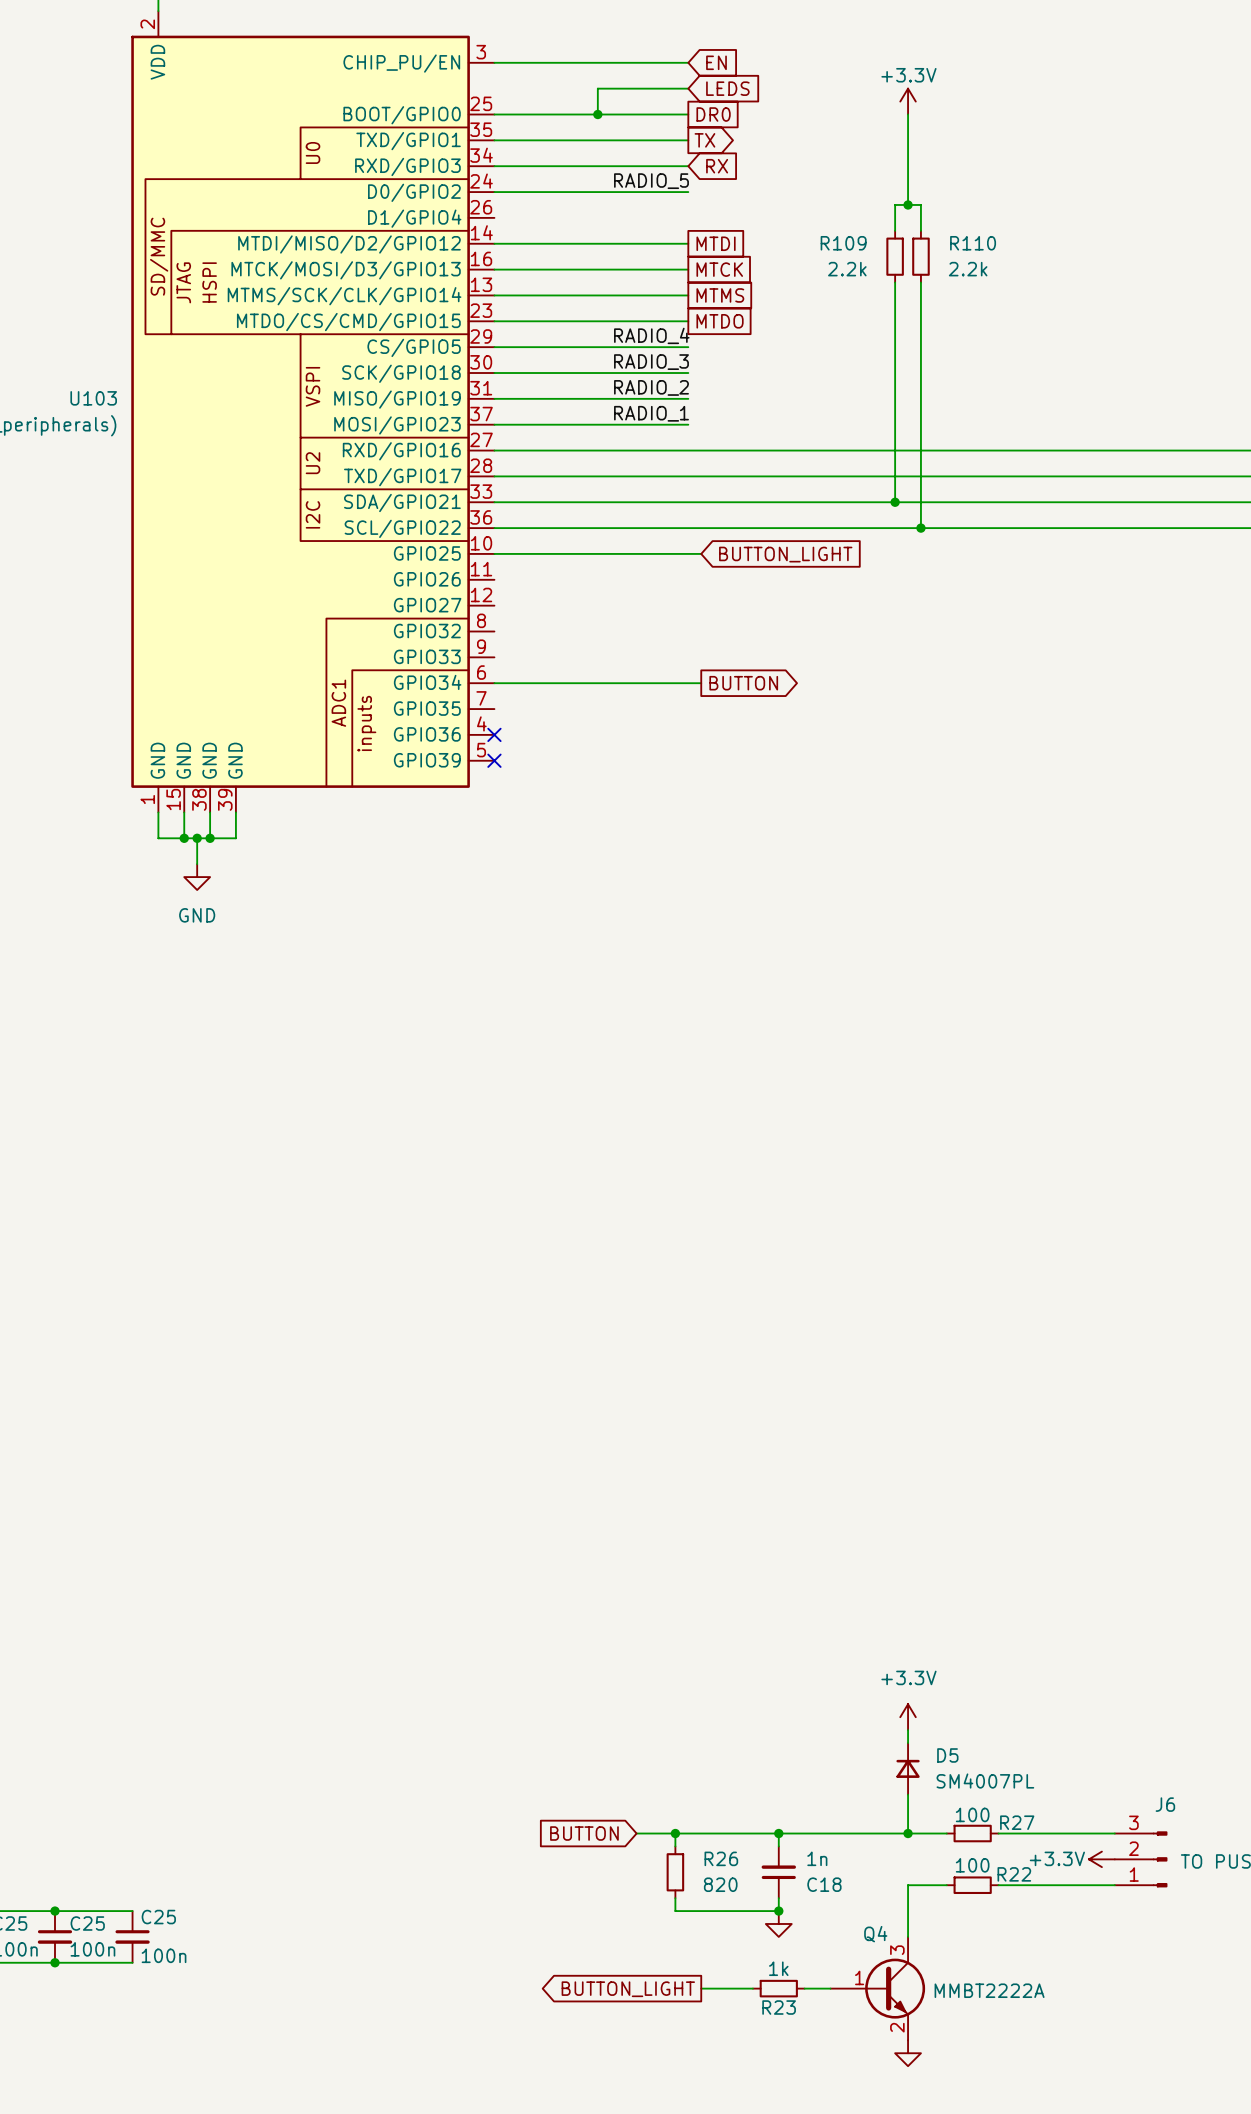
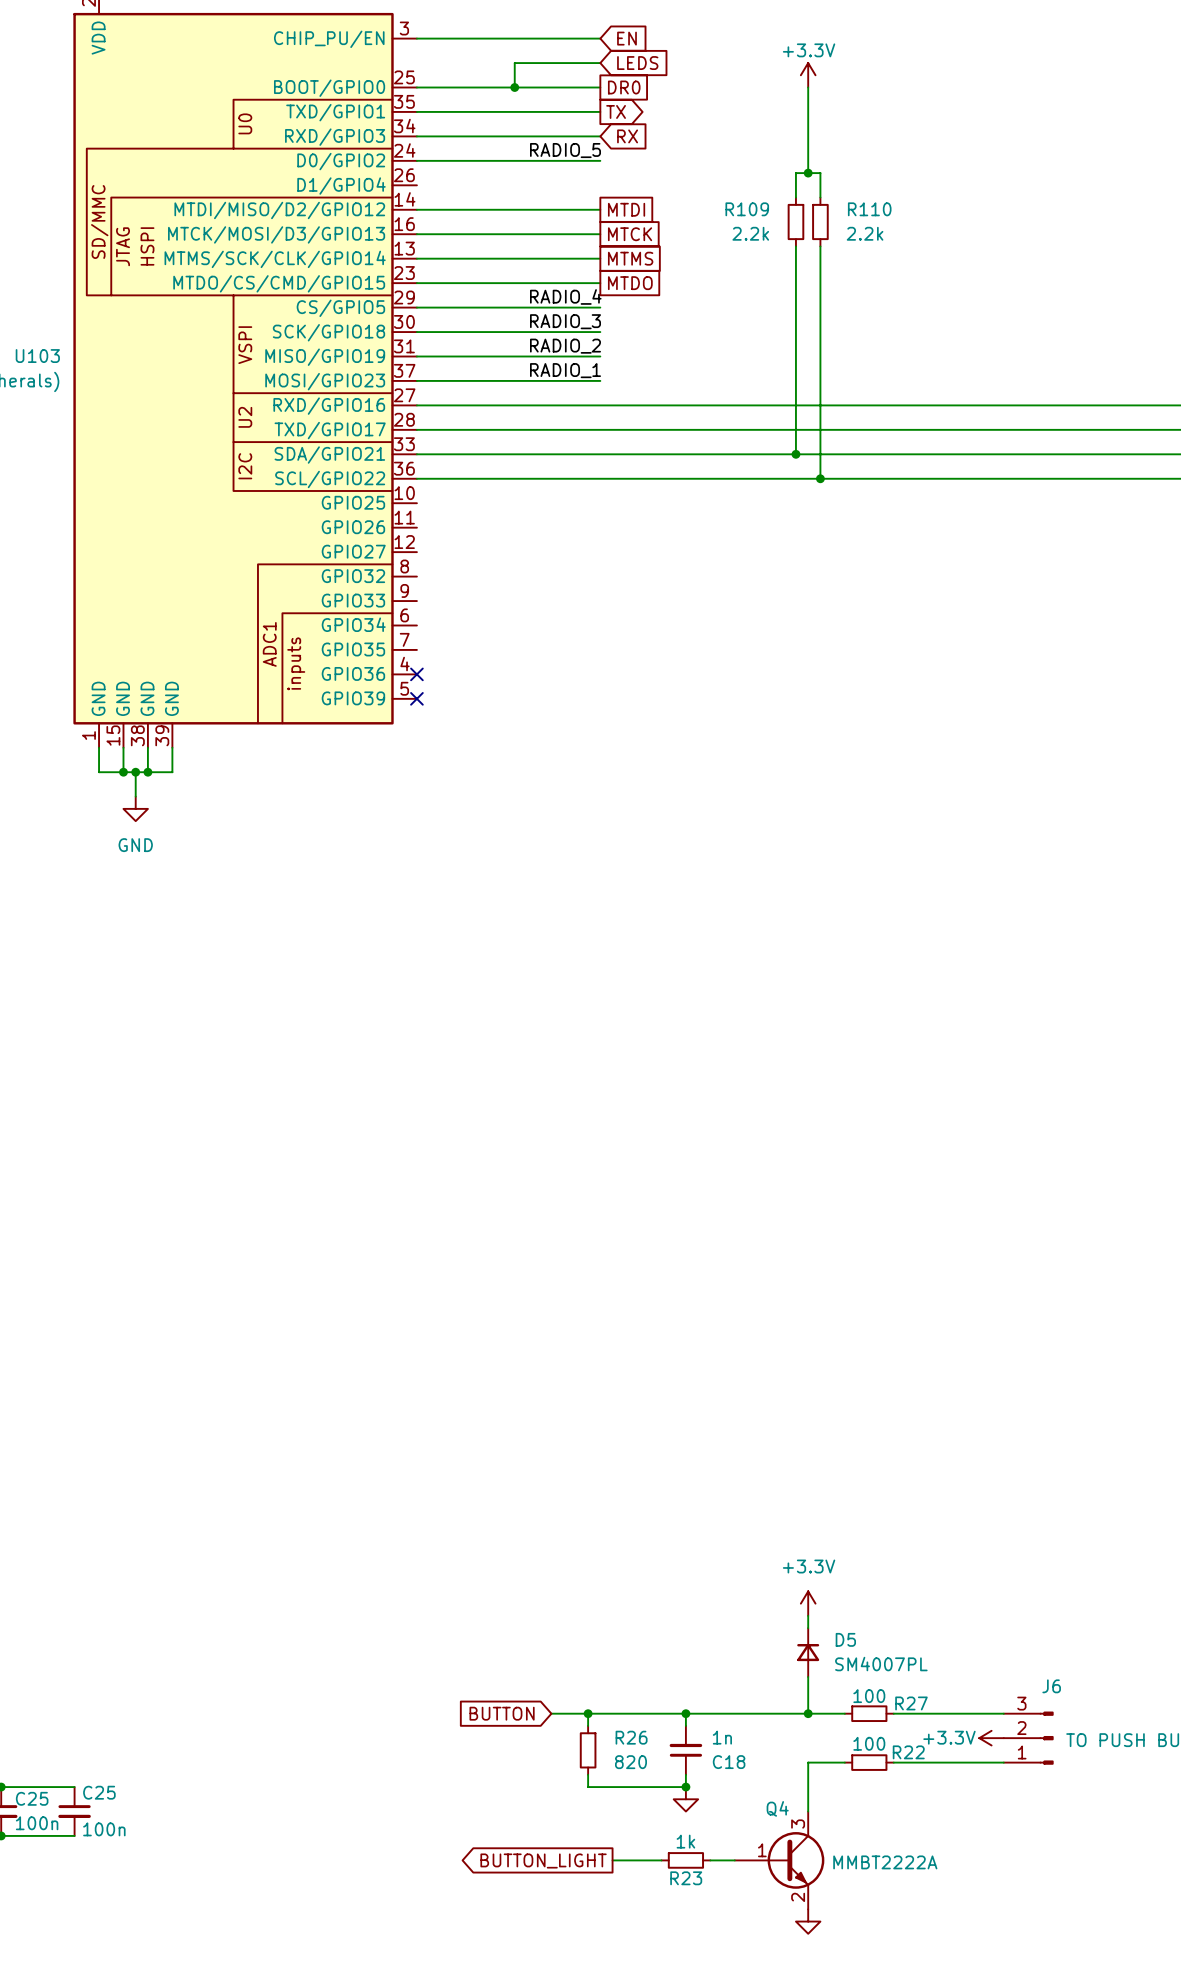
wire: (494, 553) (701, 553) -> none
global label: BUTTON_LIGHT (785, 554) -> none
wire: (494, 683) (701, 683) -> none
global label: BUTTON (743, 683) -> none

